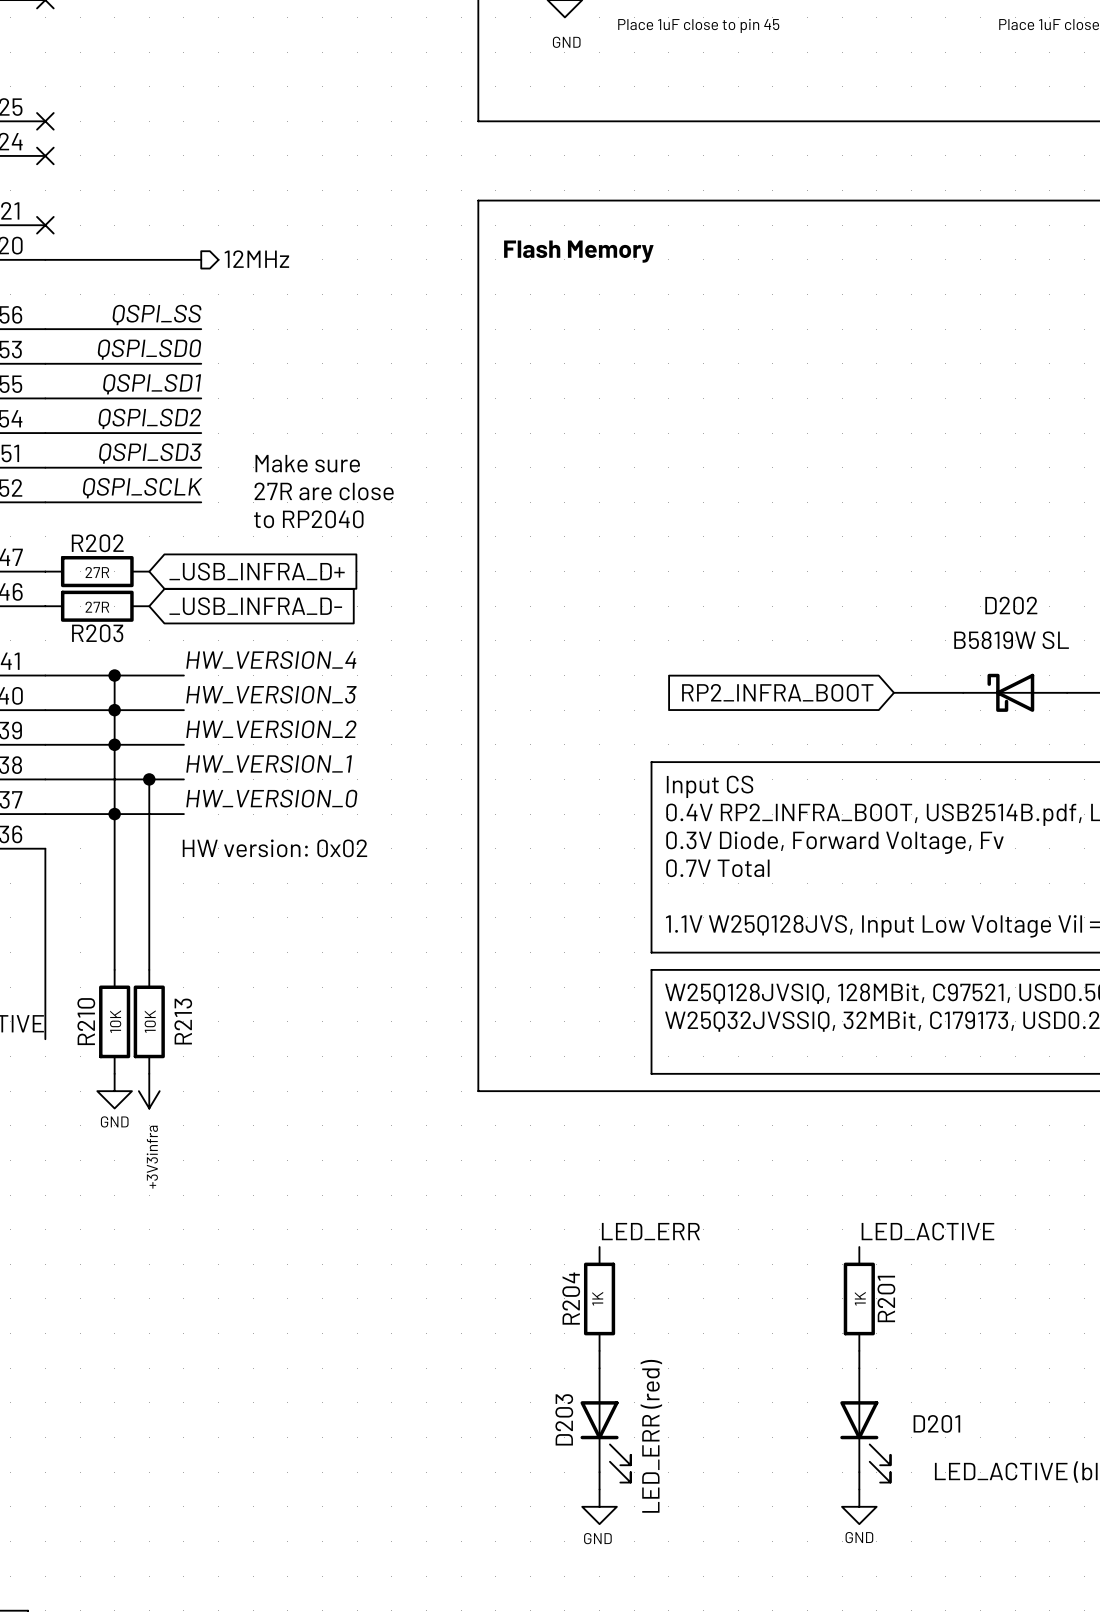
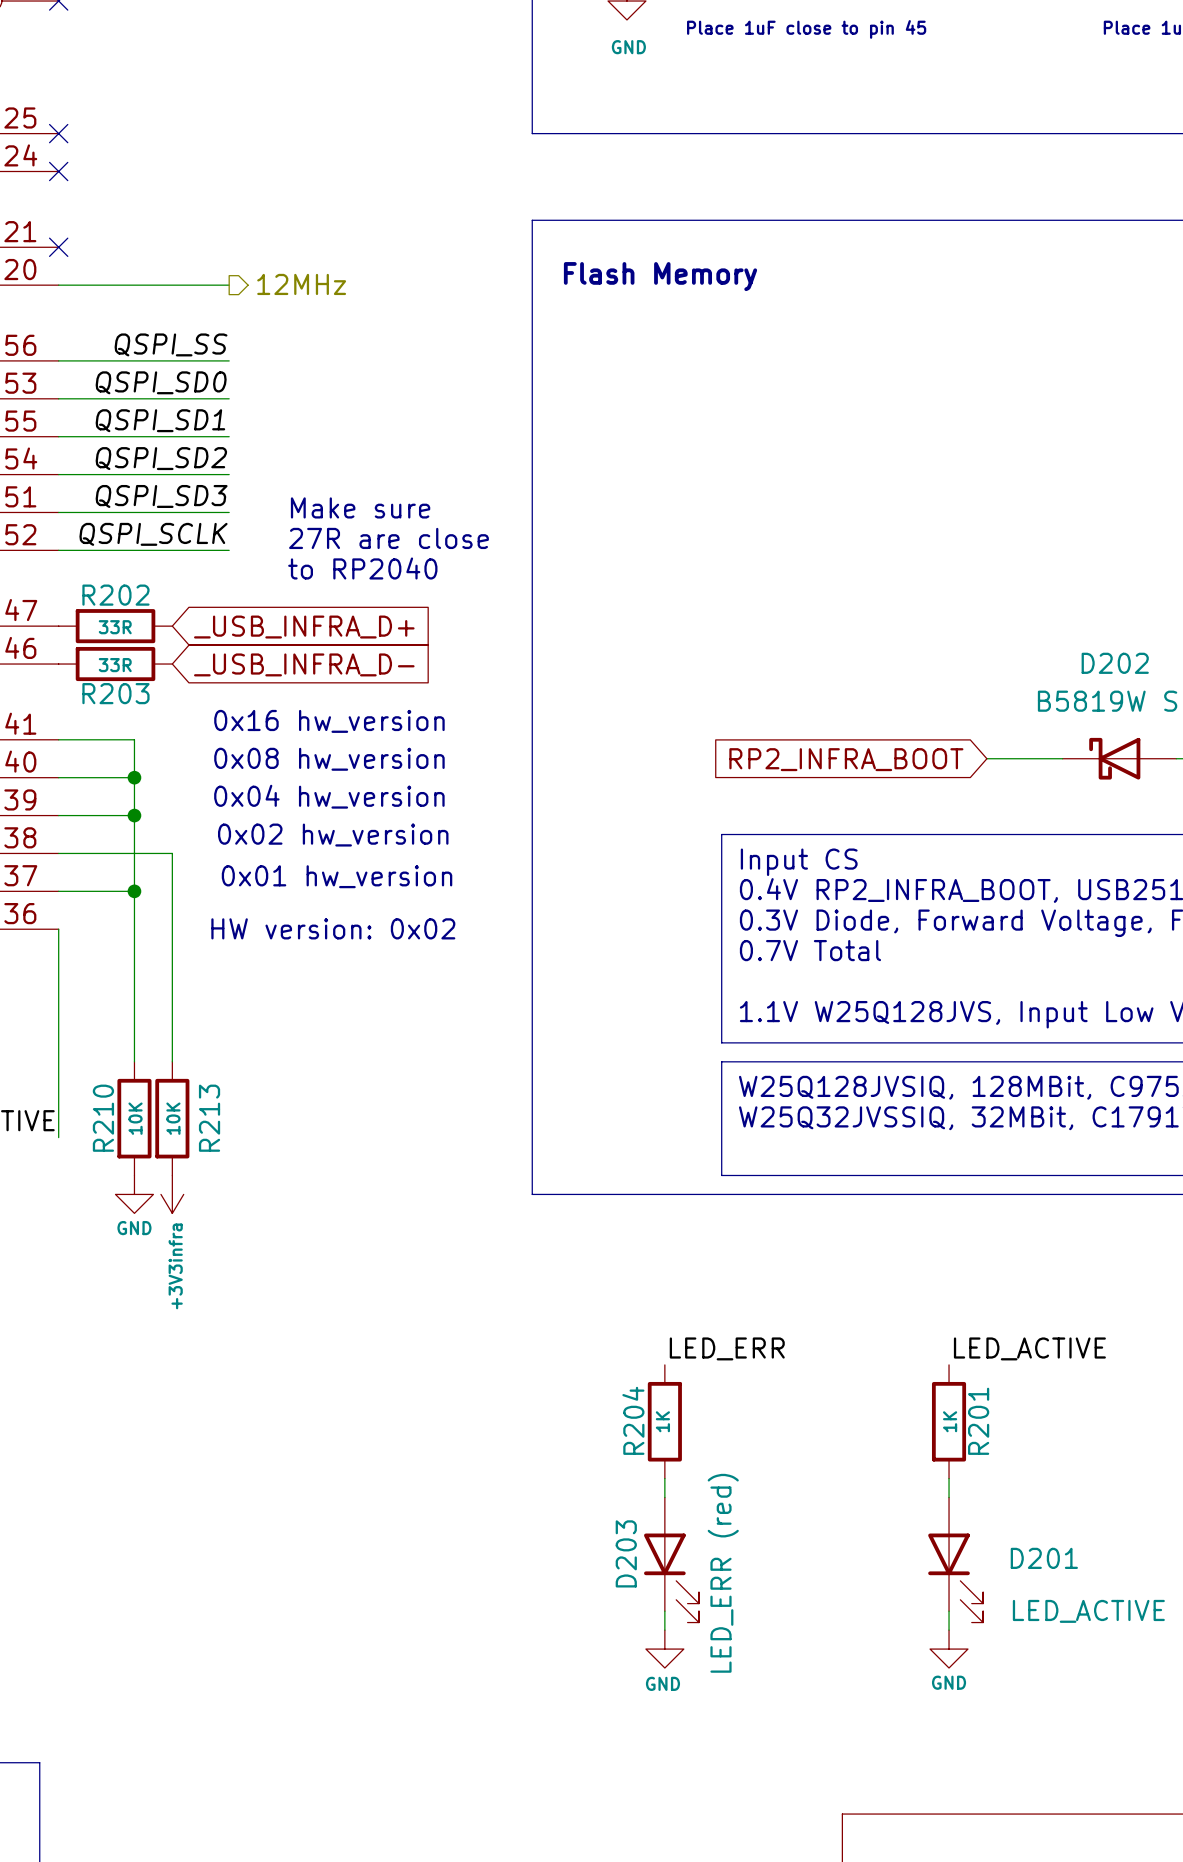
R202 value: 27R (97, 572) -> 33R (115, 627)
R203 value: 27R (97, 607) -> 33R (115, 665)
text: none -> 0x16 hw_version (329, 721)
label: HW_VERSION_4 (271, 660) -> none
wire: (114, 675) (183, 675) -> none
junction: (114, 675) -> none
text: none -> 0x08 hw_version (329, 759)
label: HW_VERSION_3 (271, 694) -> none
wire: (114, 710) (183, 710) -> none
text: none -> 0x04 hw_version (329, 796)
label: HW_VERSION_2 (271, 729) -> none
wire: (114, 744) (183, 744) -> none
text: none -> 0x02 hw_version (333, 835)
label: HW_VERSION_1 (269, 763) -> none
wire: (149, 779) (183, 779) -> none
junction: (149, 779) -> none
label: HW_VERSION_0 (271, 798) -> none
text: none -> 0x01 hw_version (337, 876)
wire: (114, 814) (183, 814) -> none

